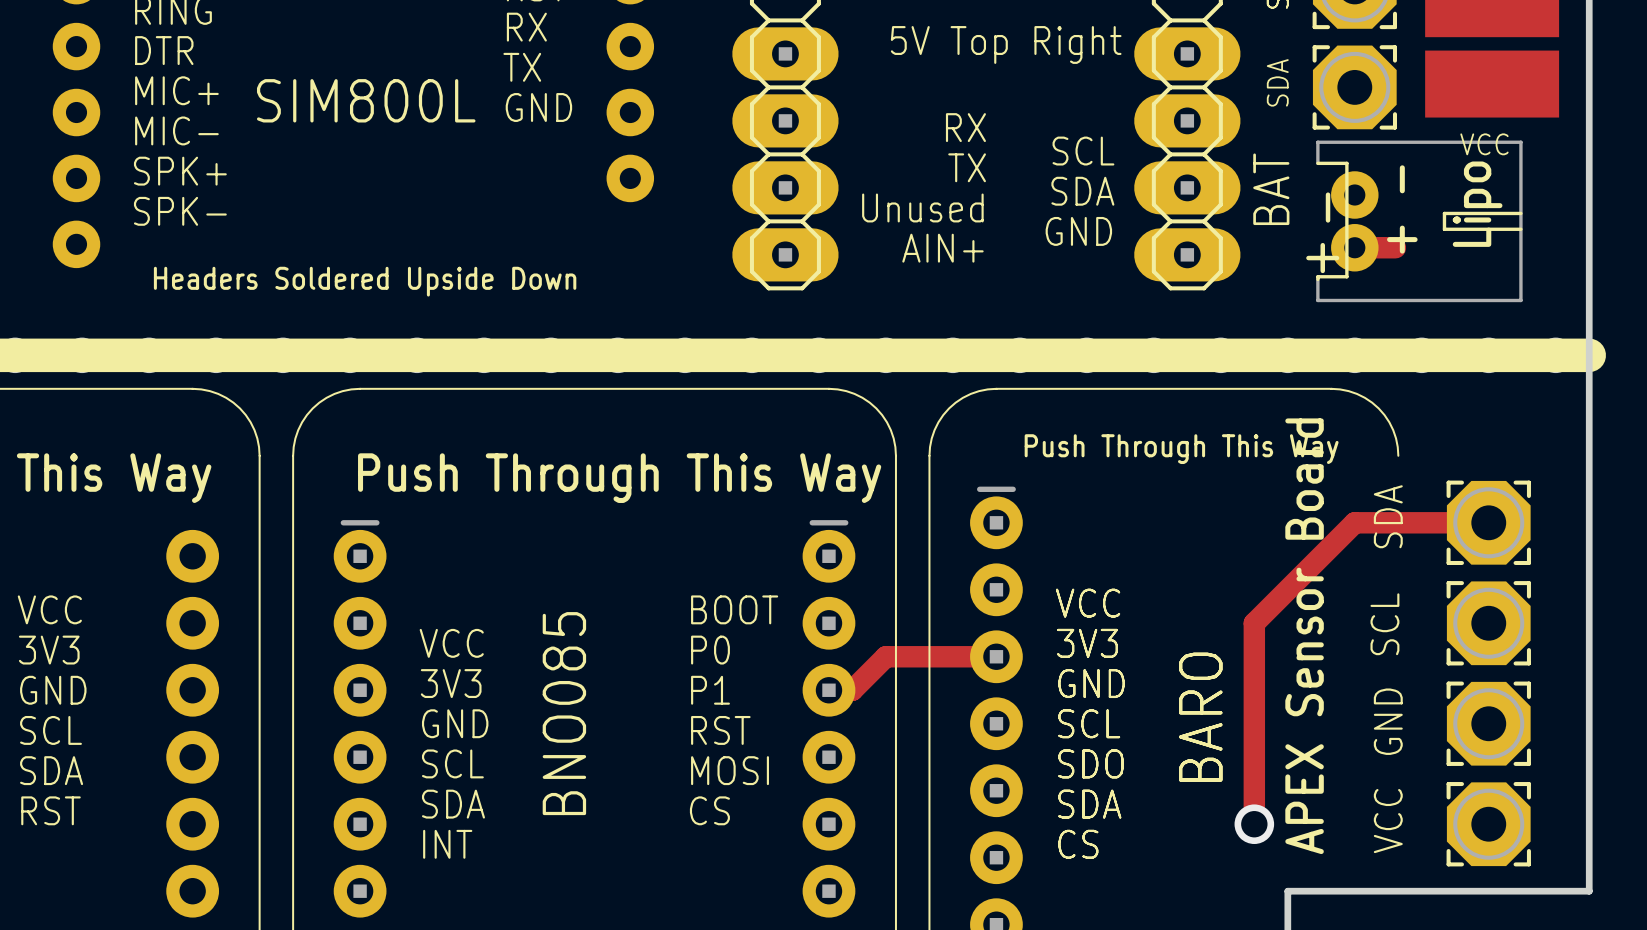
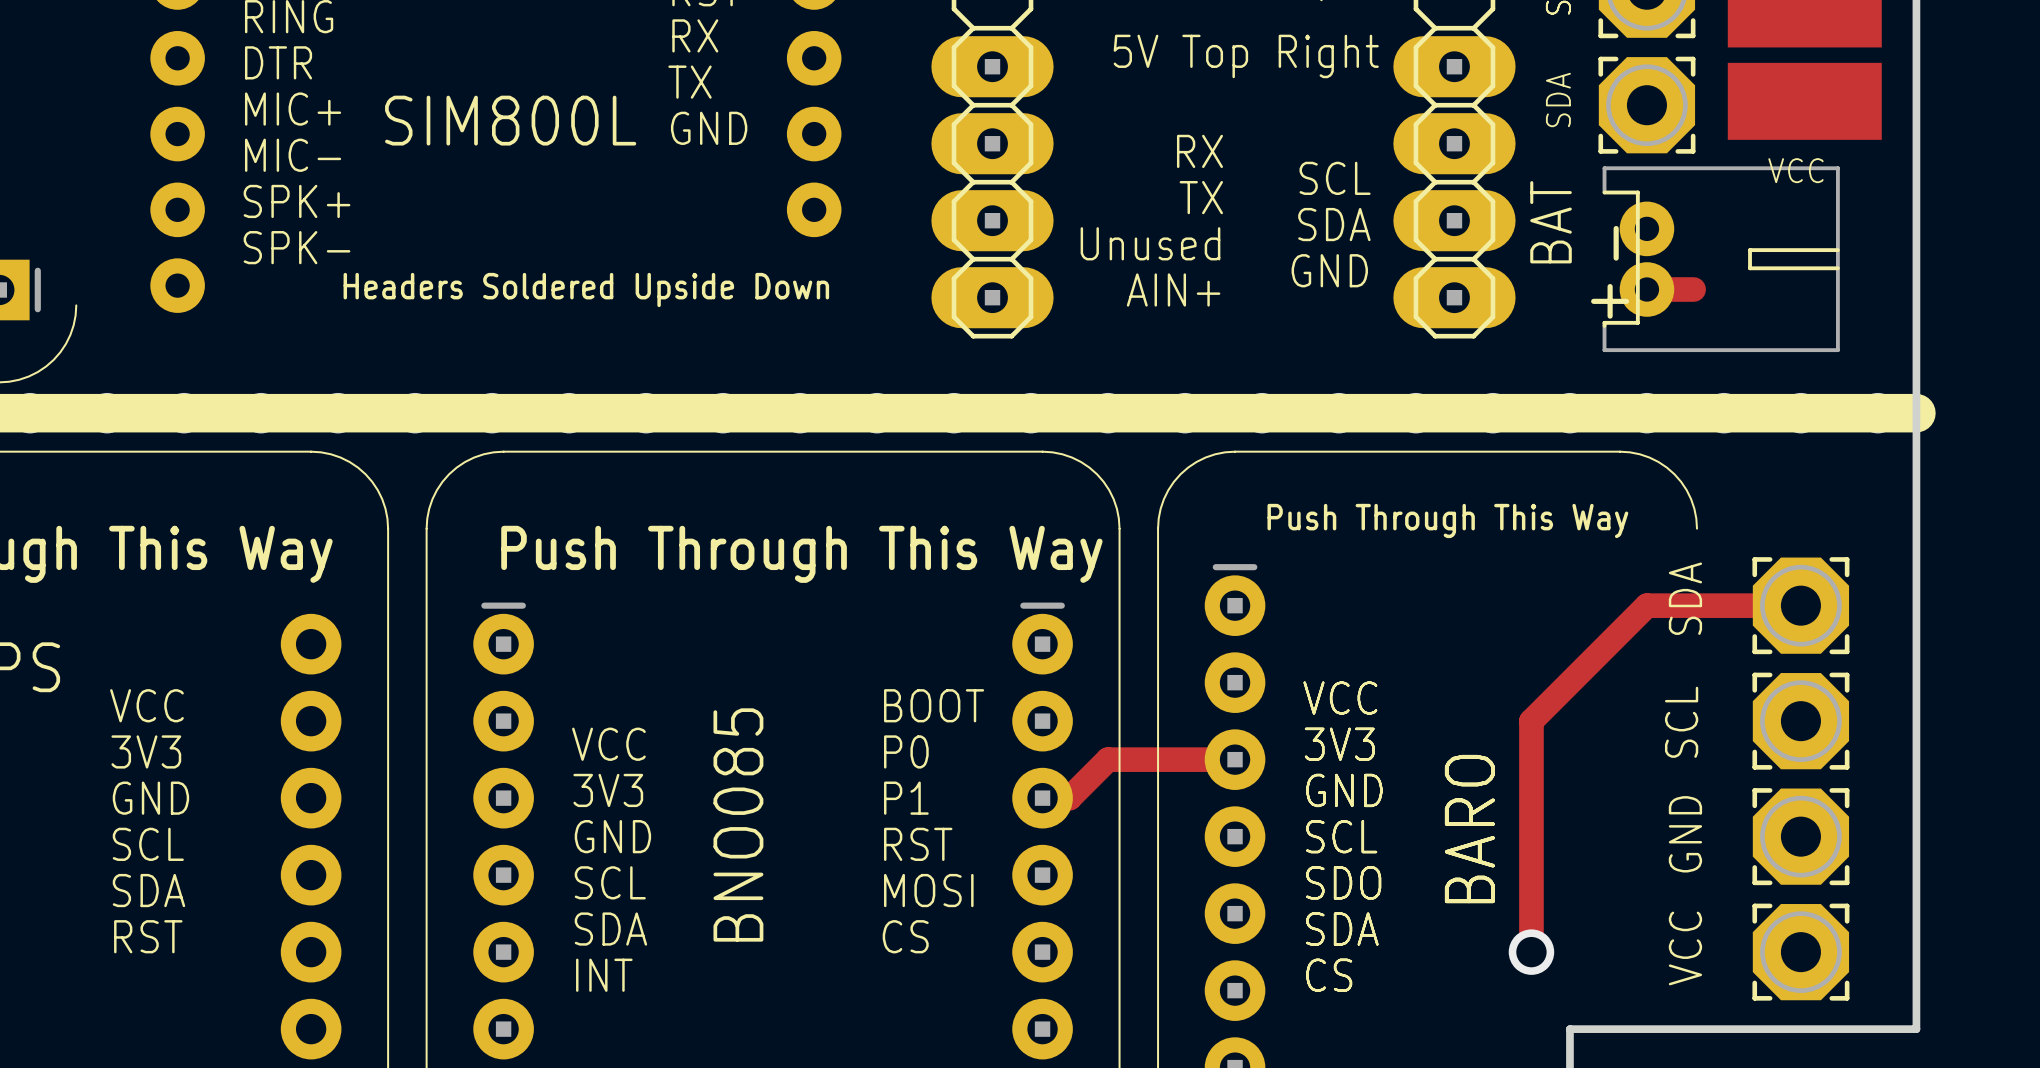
text: Lipo (1477, 204) -> none
text: + - (1402, 209) -> none
text position: Headers Soldered Upside Down (365, 281) -> Headers Soldered Upside Down (586, 289)
text: APEX Sensor Board (1304, 636) -> none

